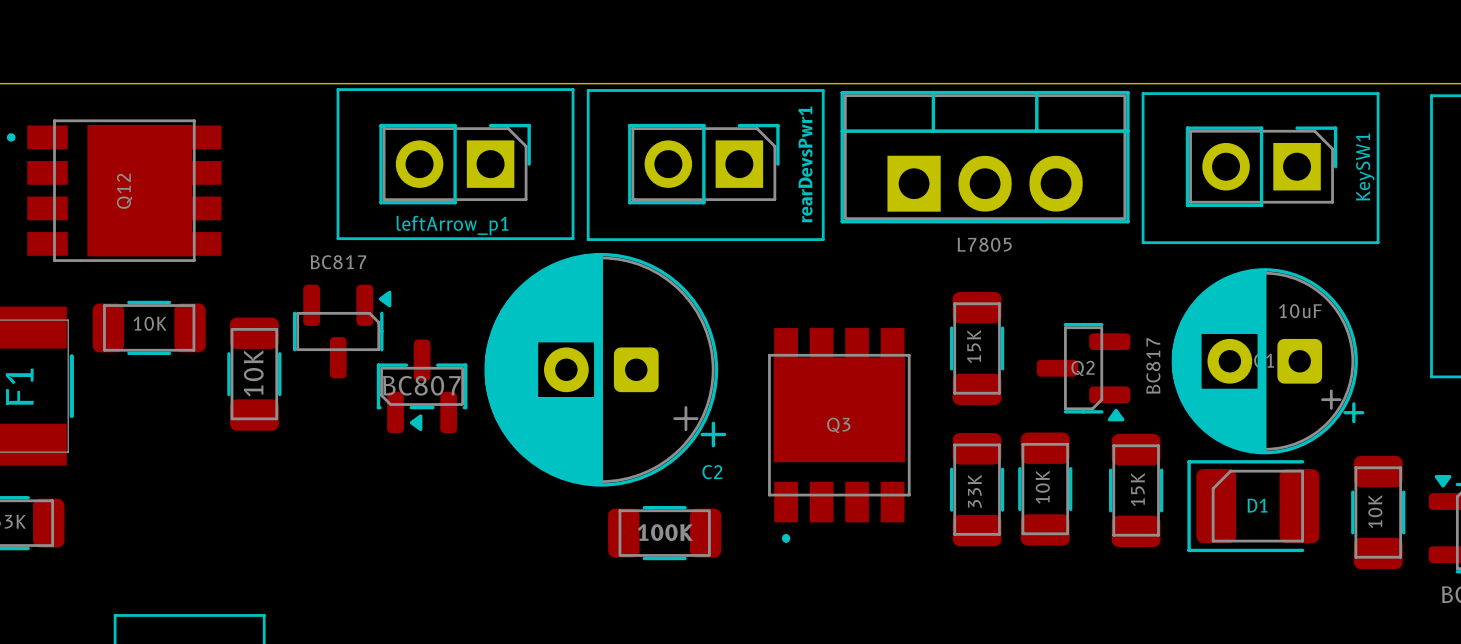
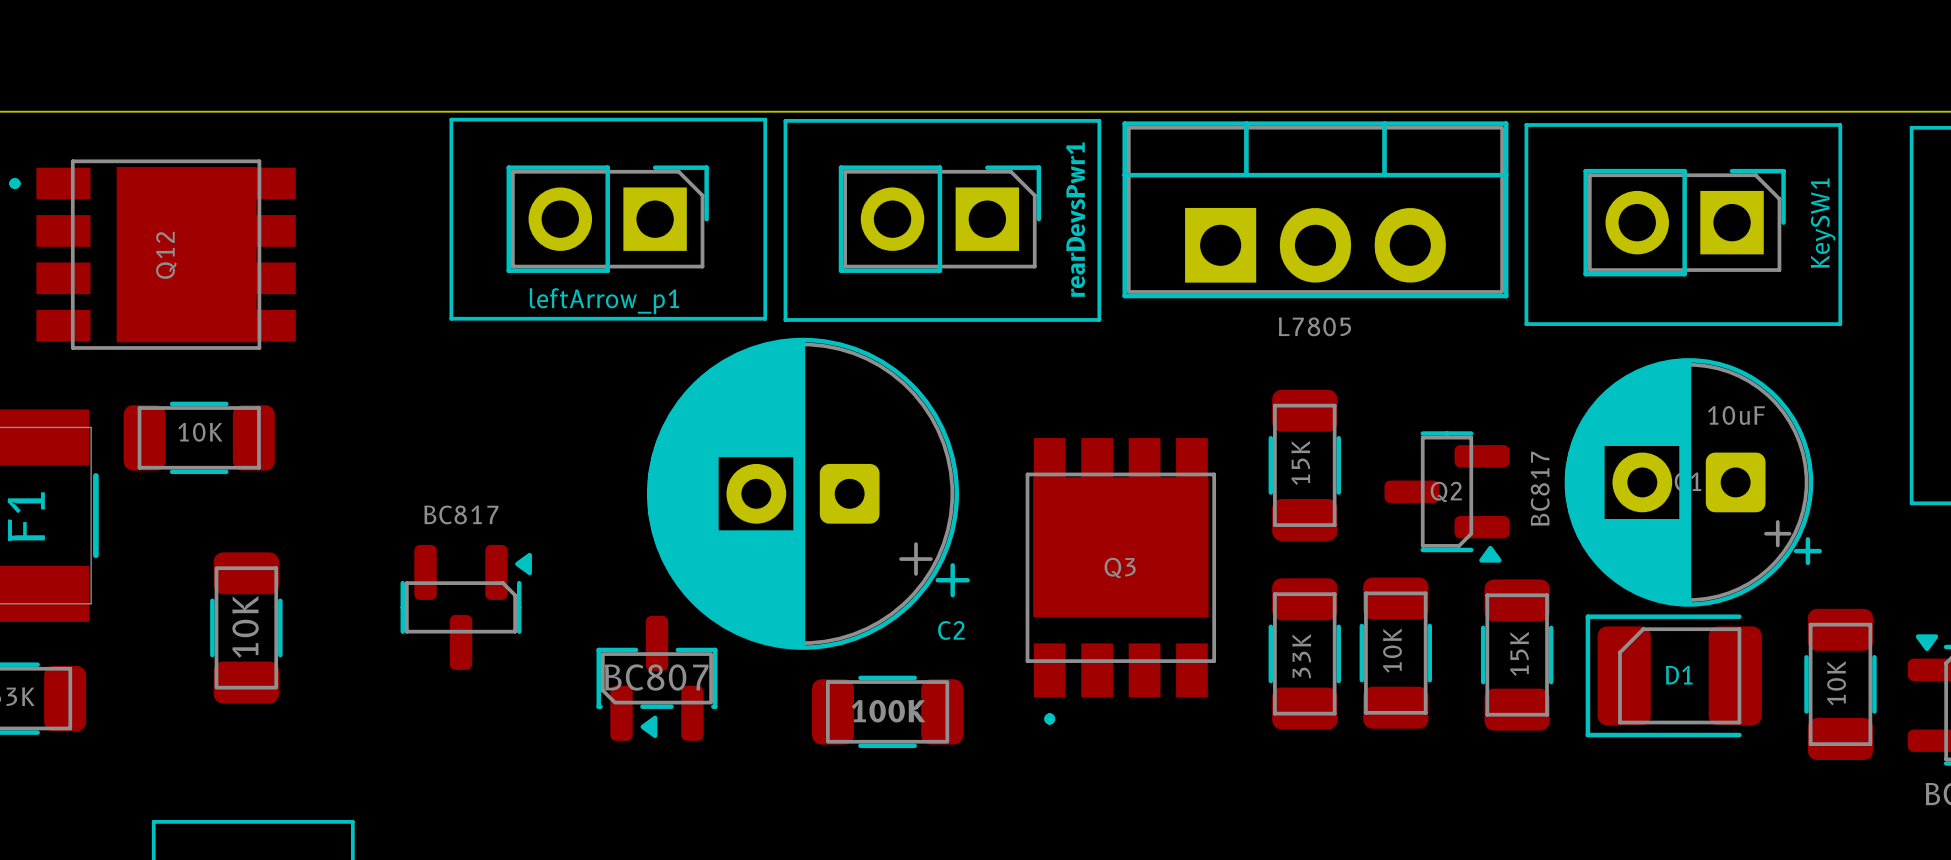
part position: (342, 331) -> (466, 607)
part position: (254, 374) -> (246, 627)
part position: (422, 386) -> (656, 678)

